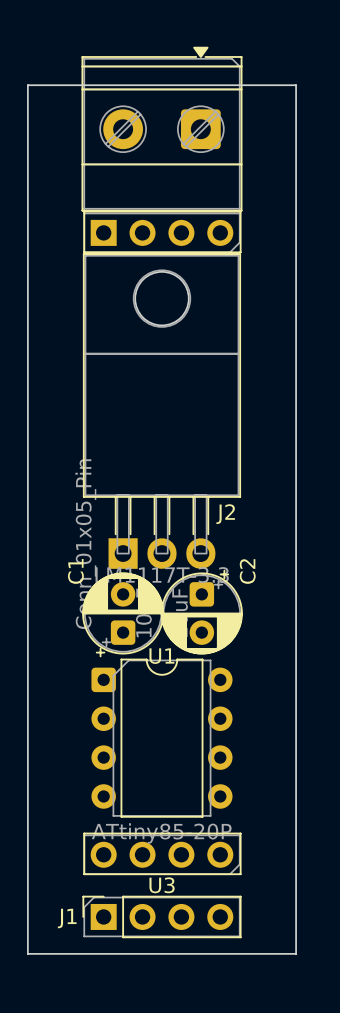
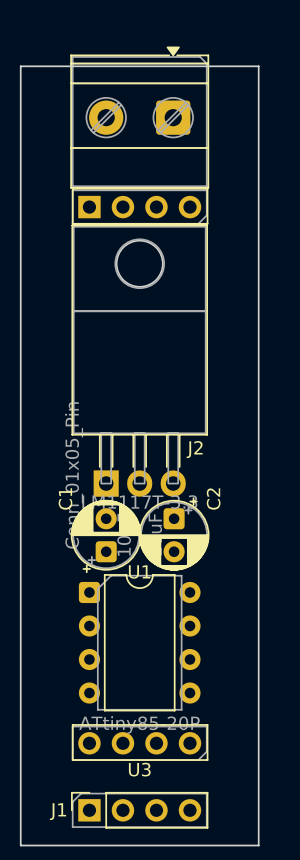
board edge: (27, 85) (296, 85) (296, 953) (27, 953) (27, 85) -> (20, 66) (20, 845) (258, 845) (258, 66) (20, 66)
J1 position: (161, 916) -> (139, 810)

